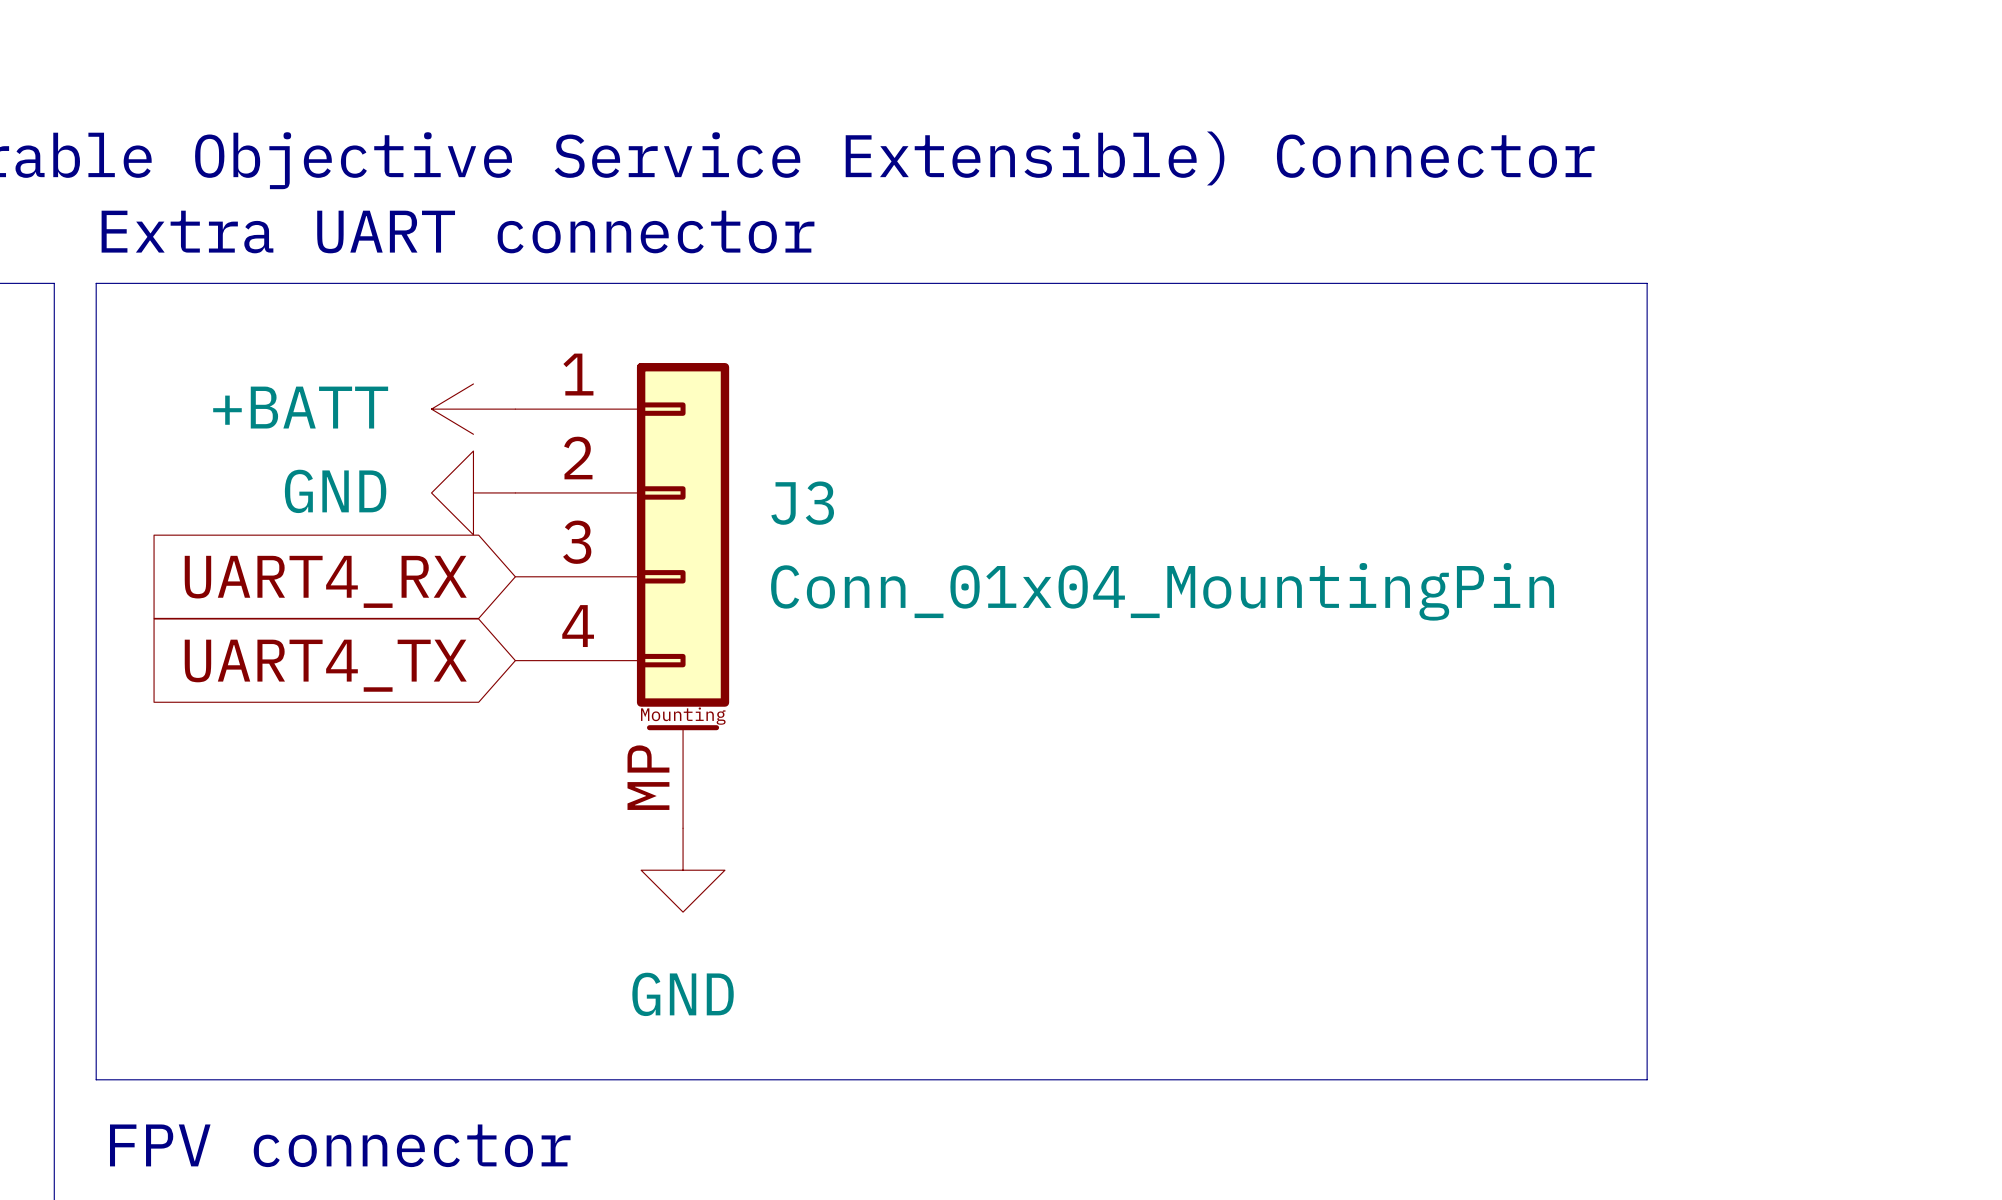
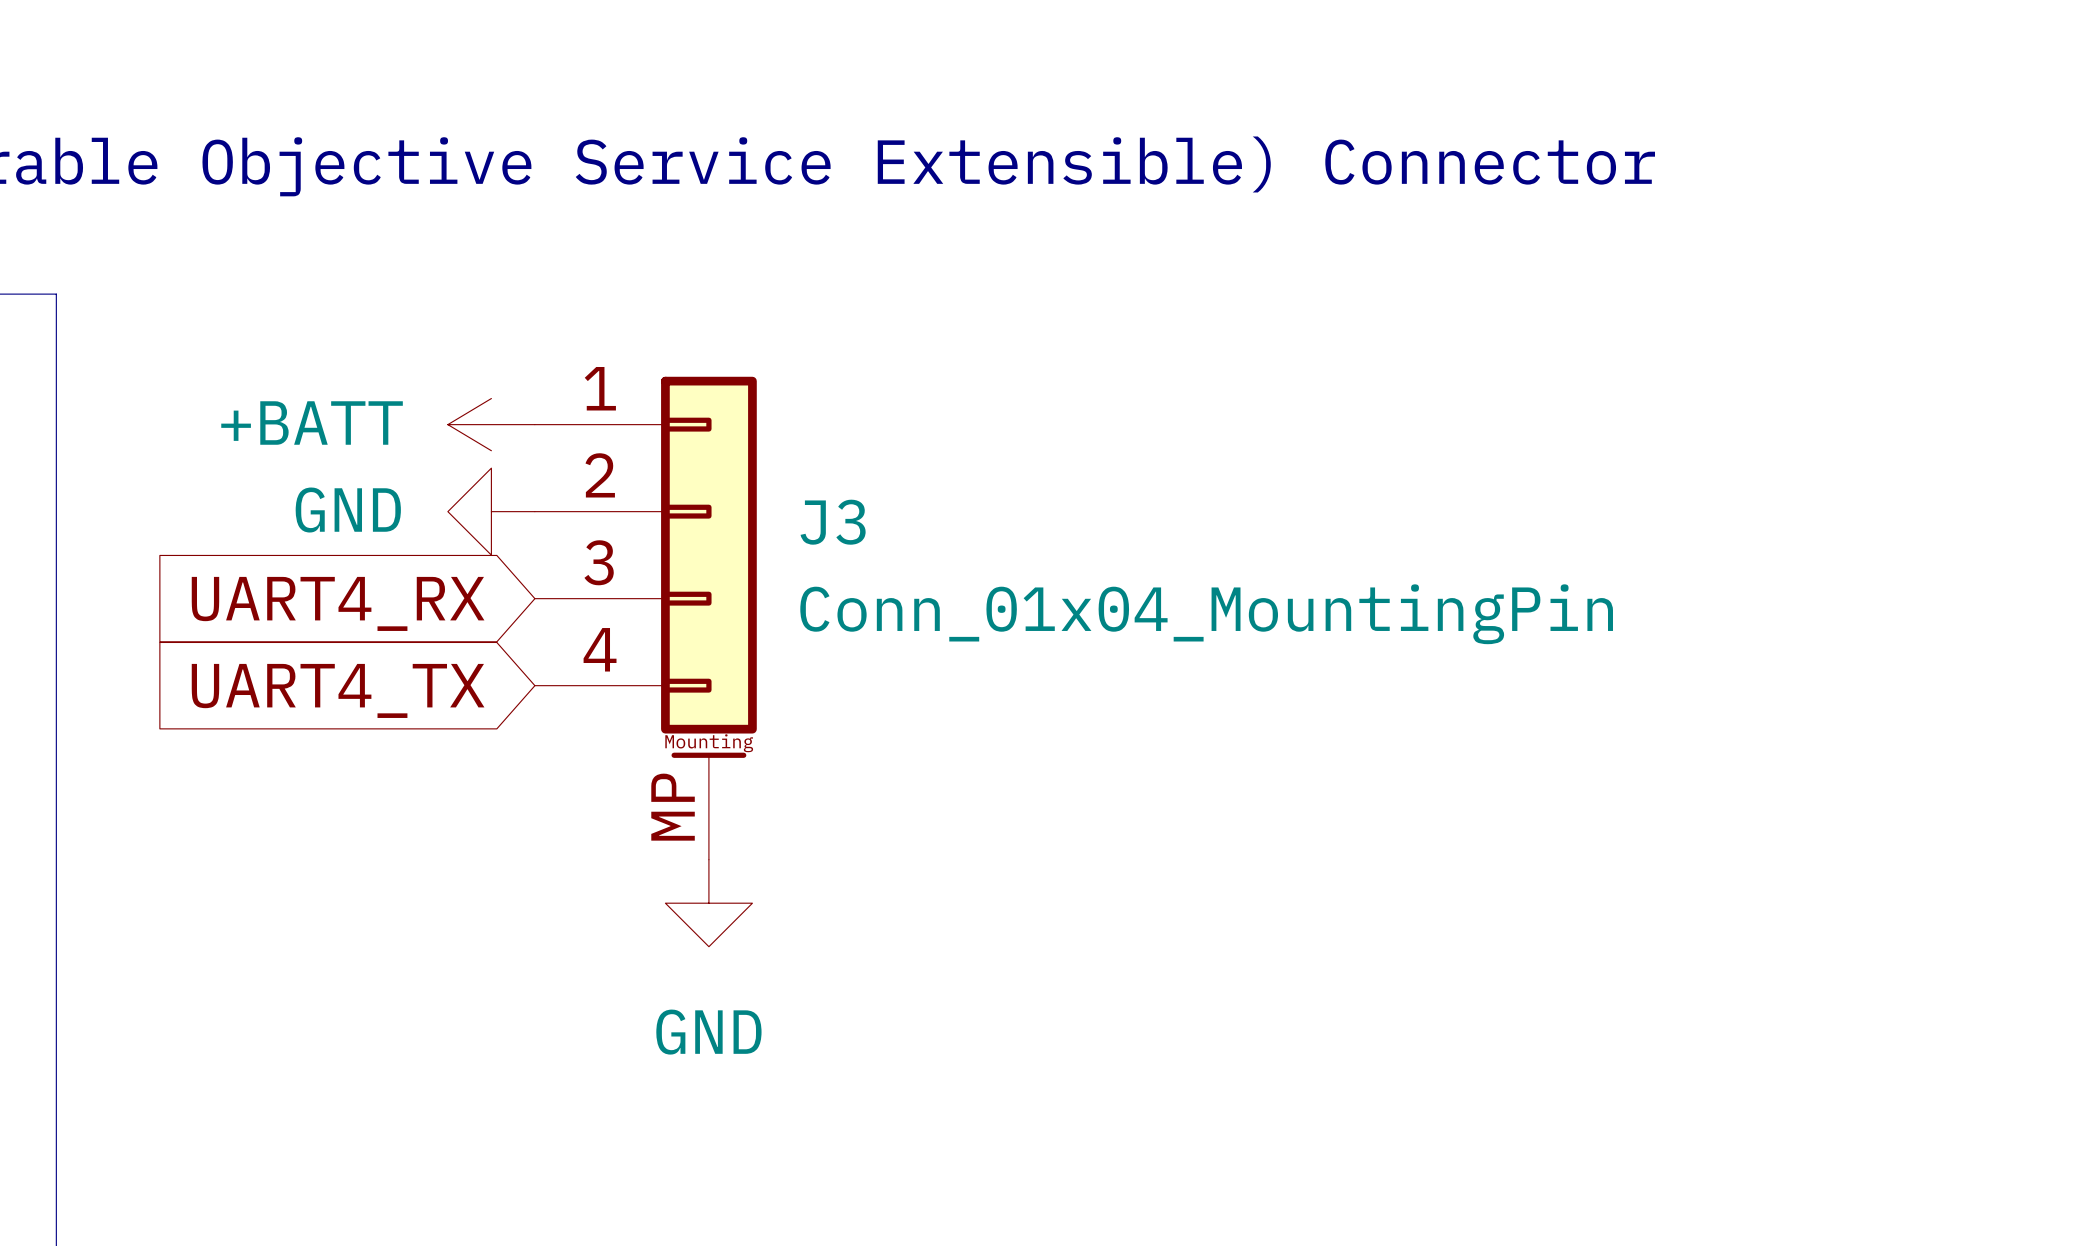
text: Extra UART connector (458, 232) -> none
line: (96, 283) (1647, 283) (1647, 1079) (96, 1079) (96, 283) -> none
text: FPV connector (340, 1145) -> none

